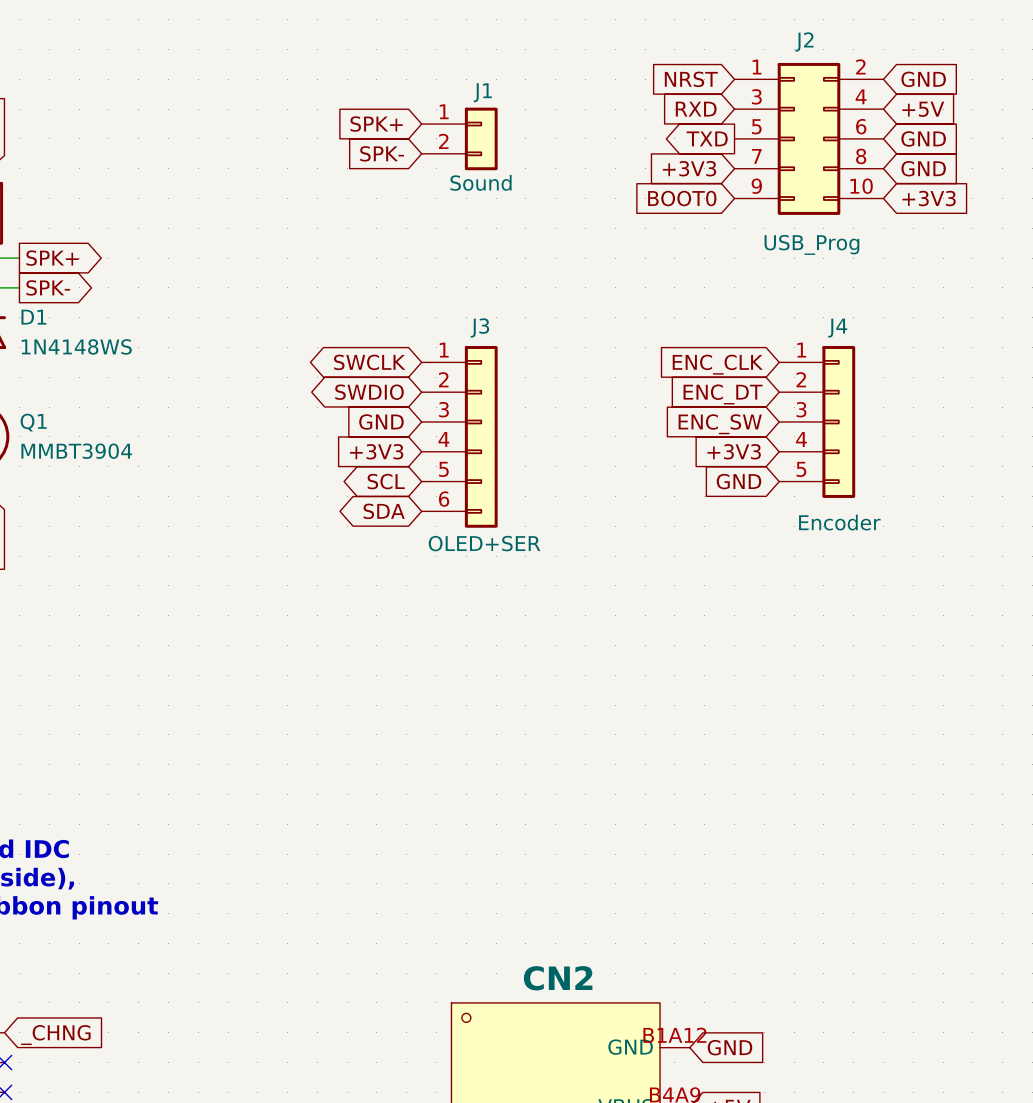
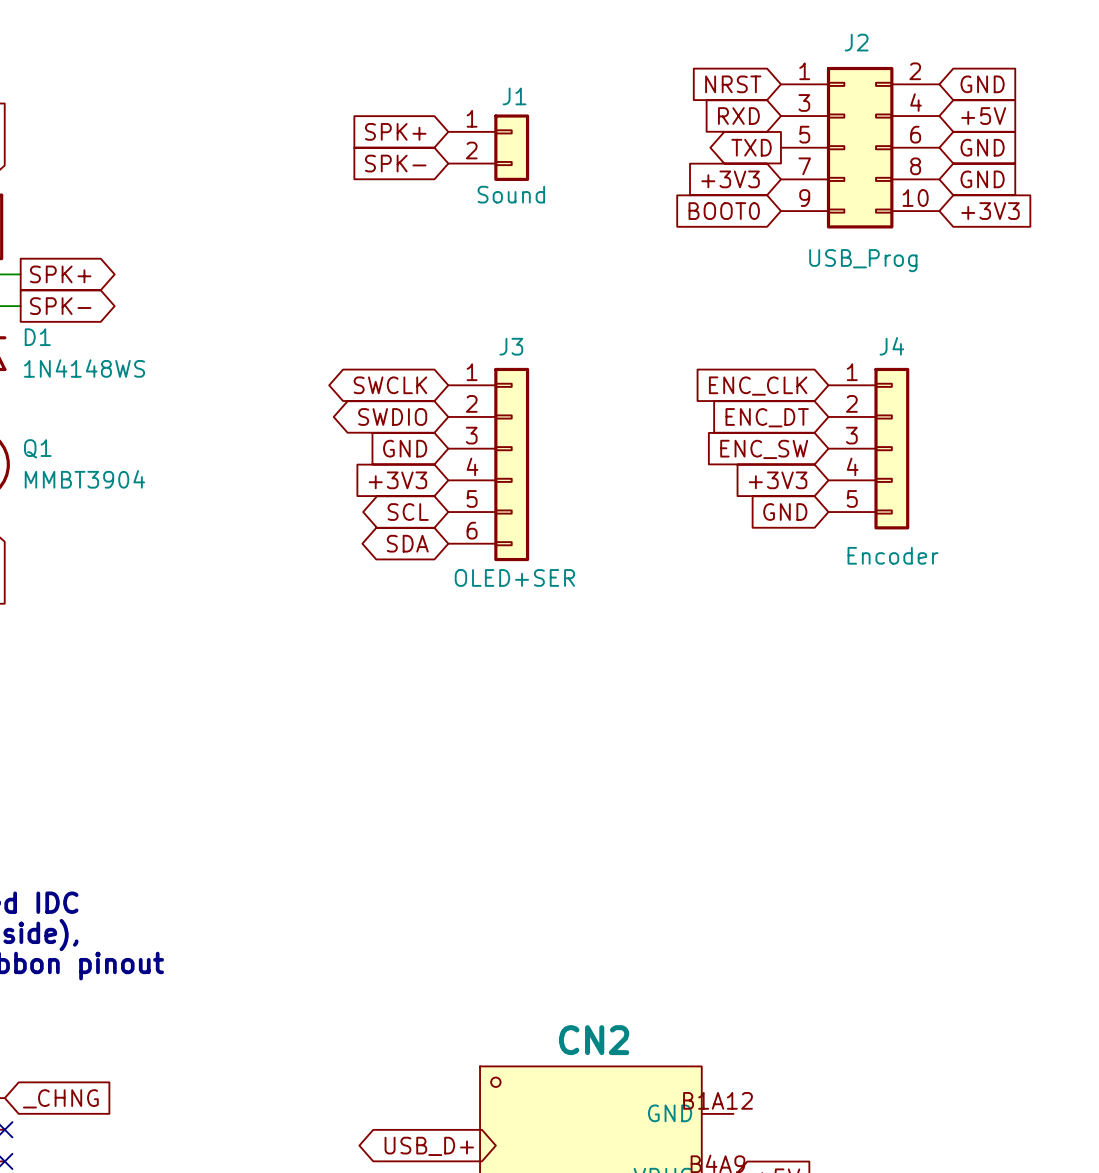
global label: GND (729, 1047) -> none
global label: none -> USB_D+ (429, 1146)

